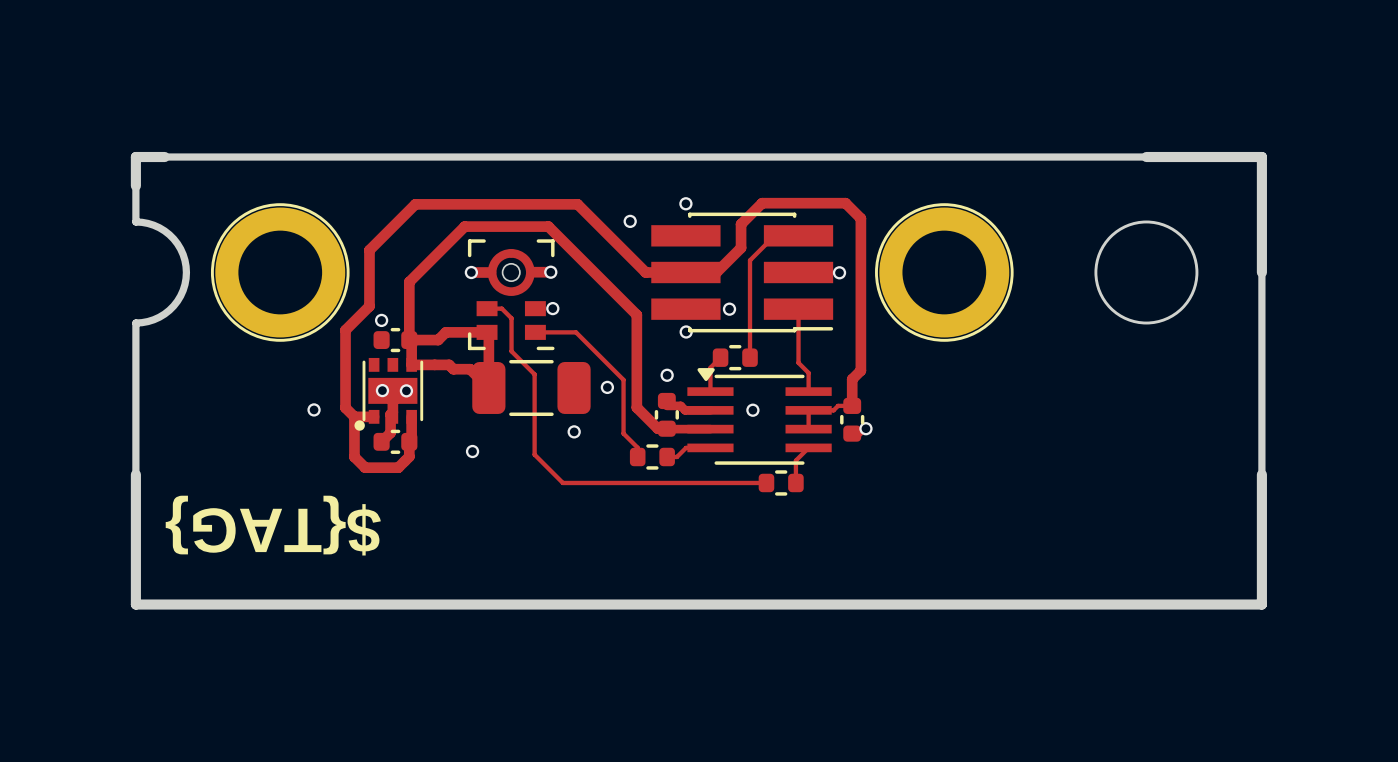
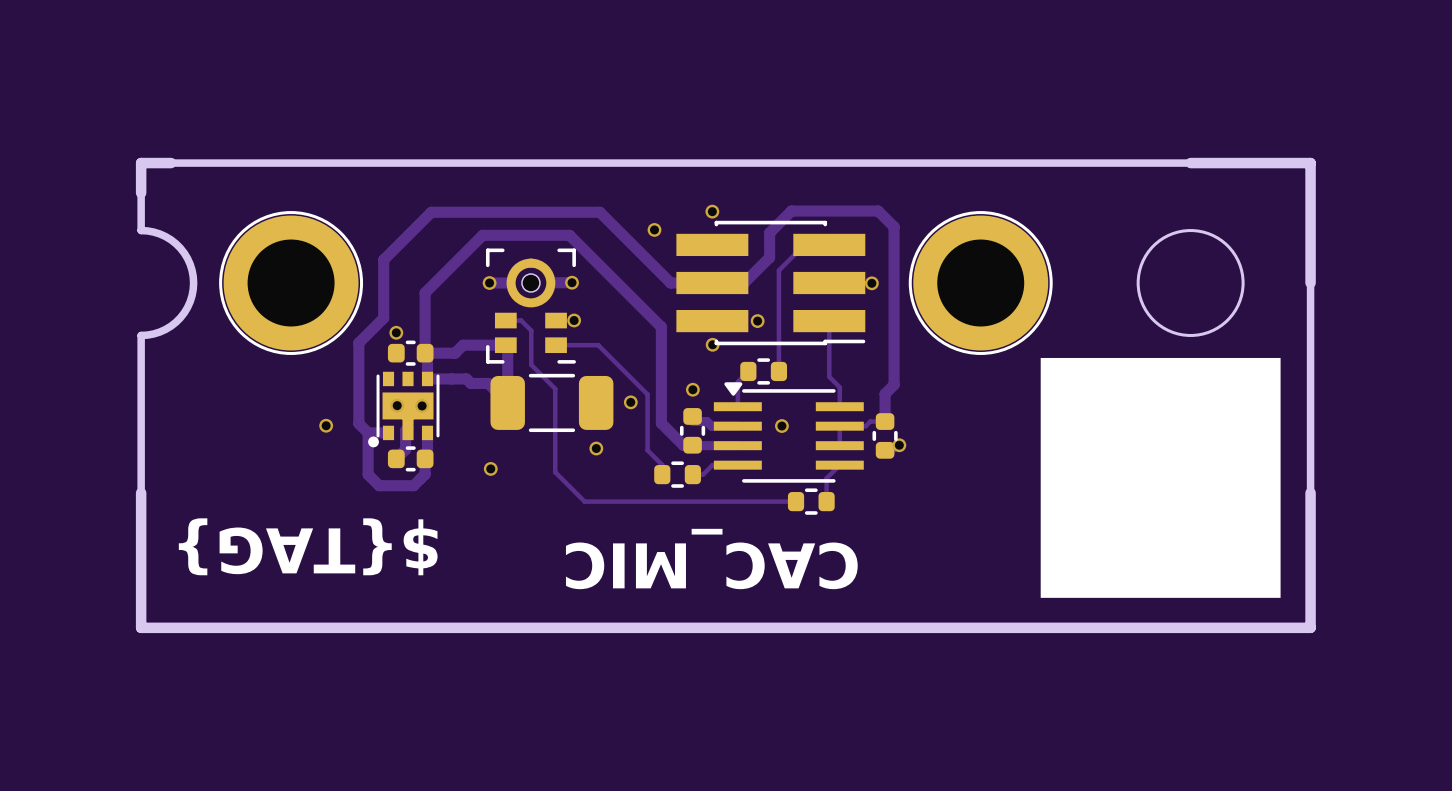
drawing: none -> [1040, 357, 1281, 598]
text: none -> CAC_MIC (711, 559)

